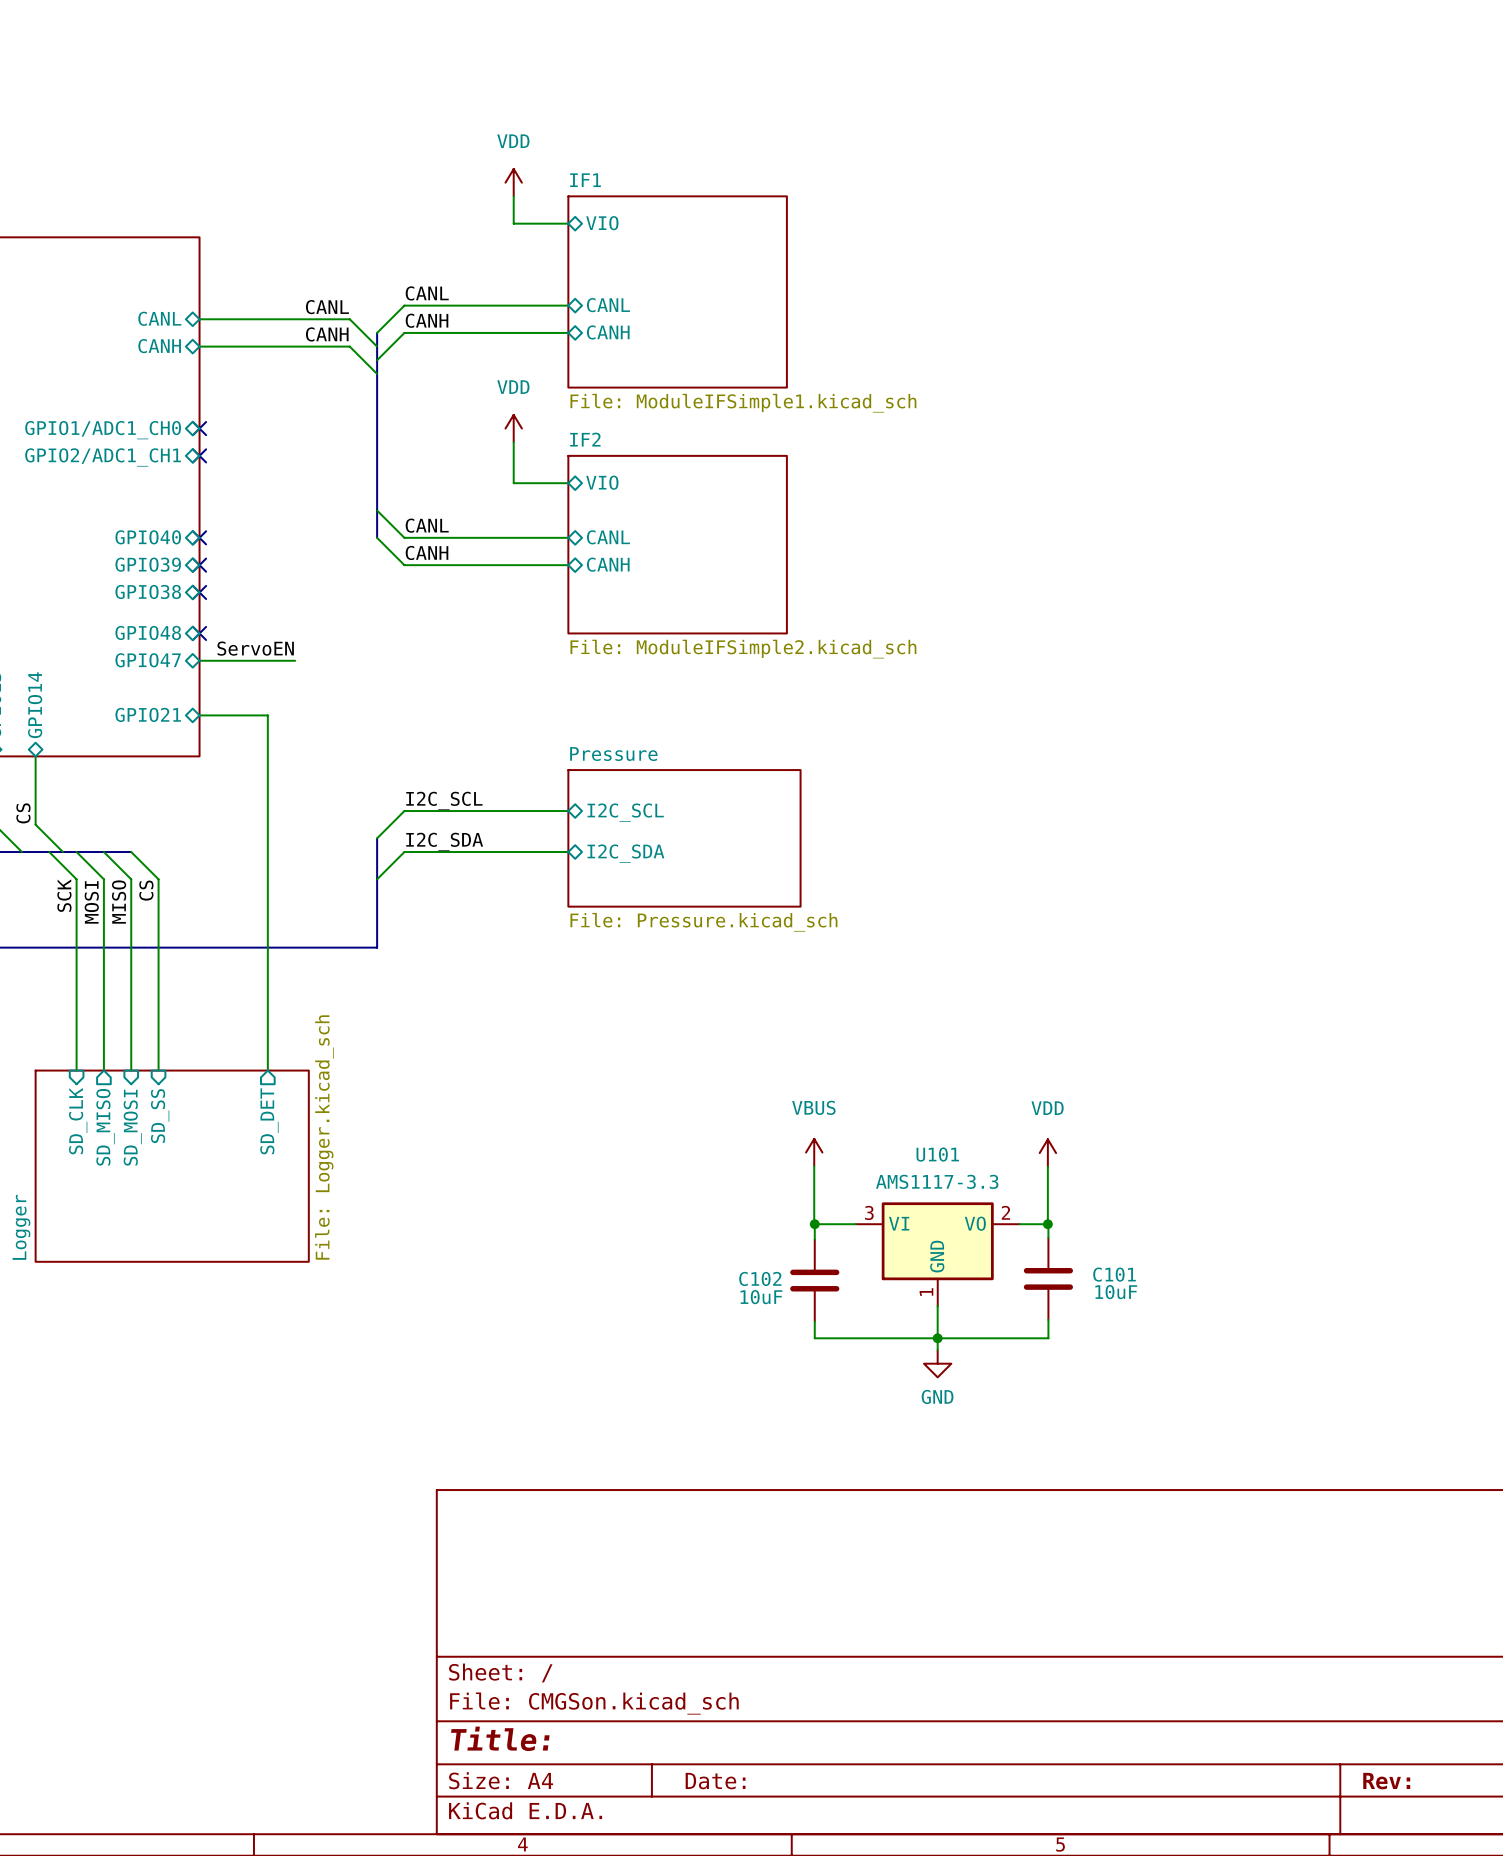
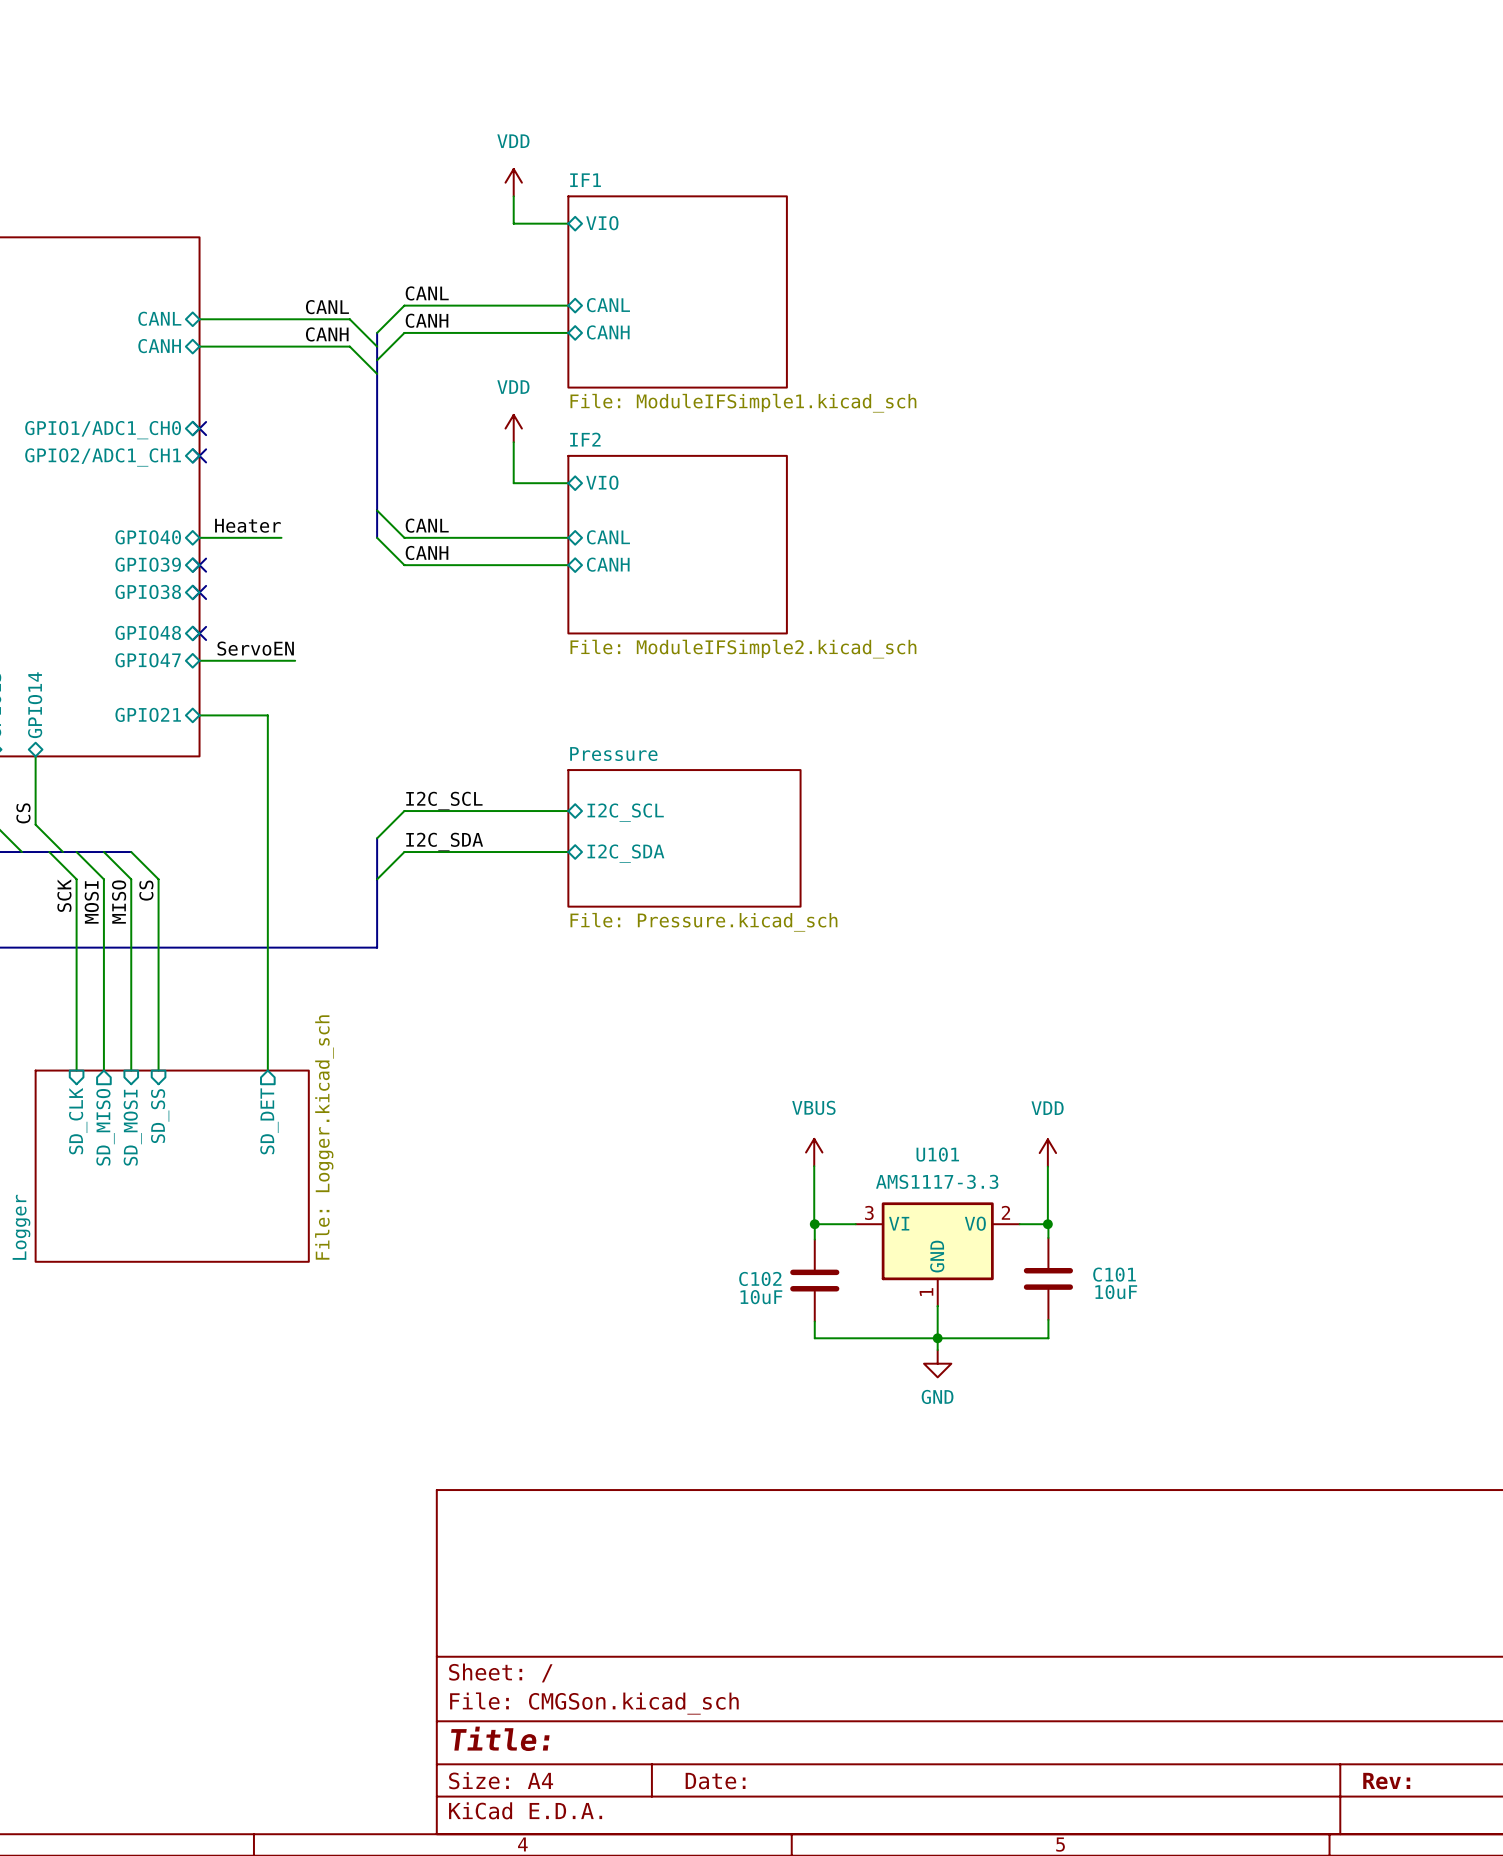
label: none -> Heater (247, 525)
wire: none -> (199, 537) (281, 537)
no-connect mark: (199, 537) -> none

